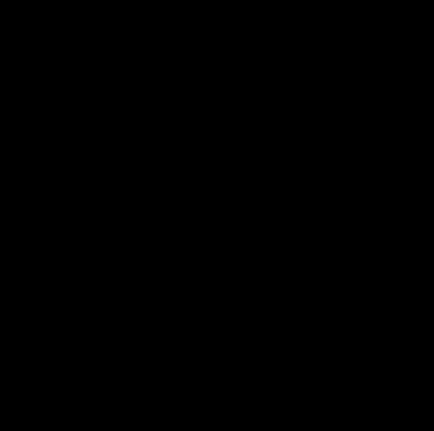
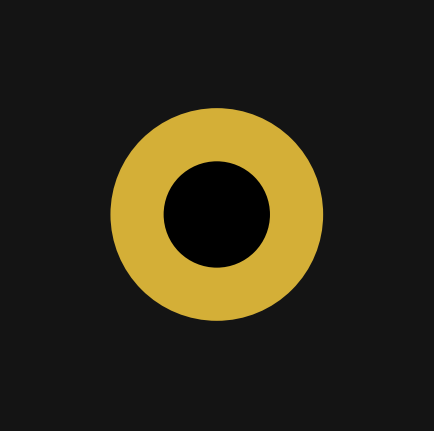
part: none -> (216, 214)

